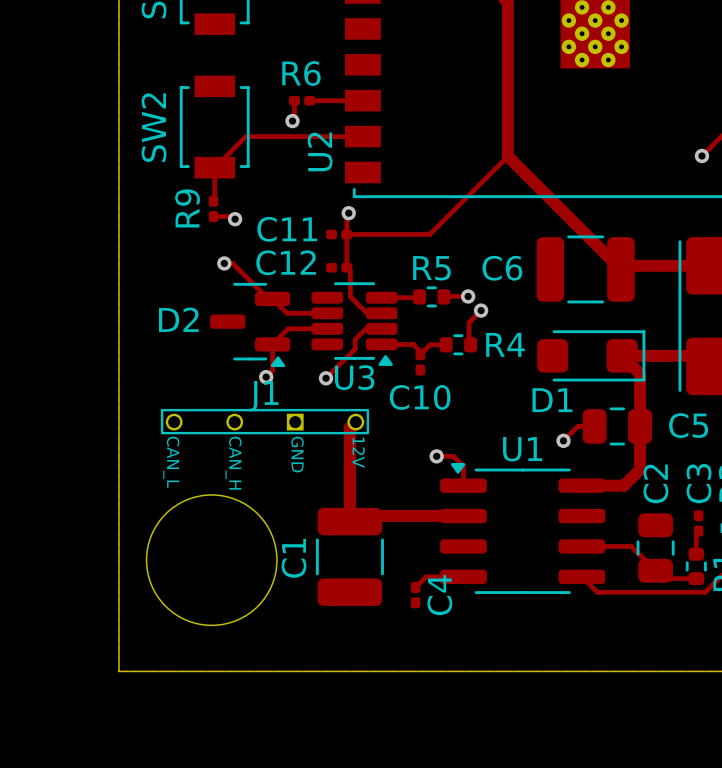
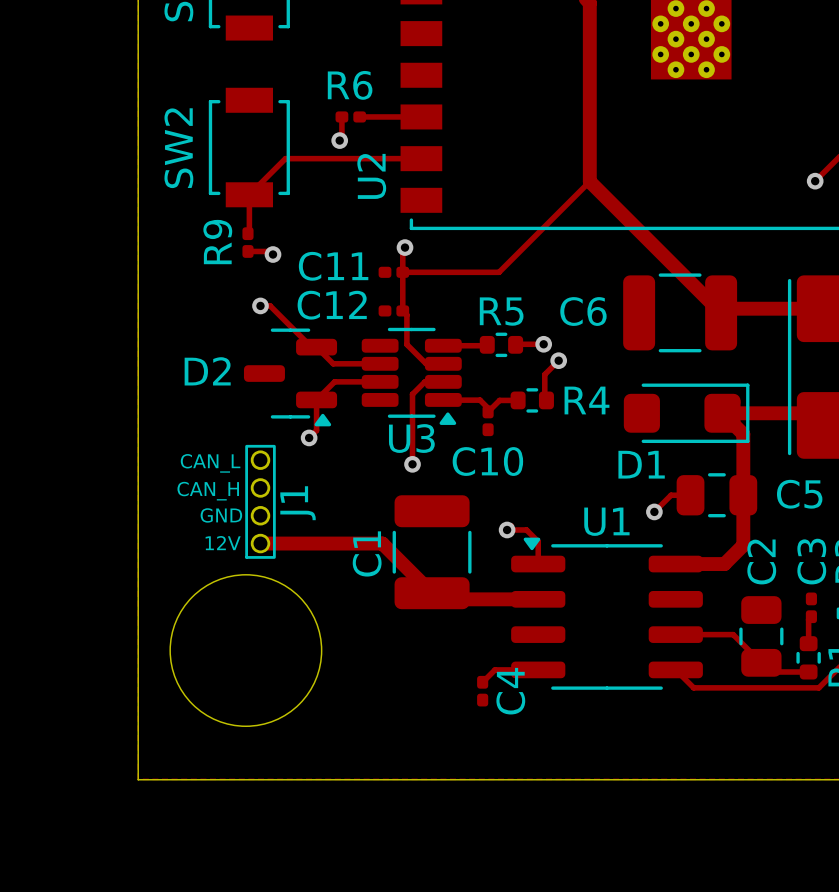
track: (355, 349) (326, 378) -> (412, 405) (412, 464)
via position: (326, 378) -> (412, 464)
J1 footprint: [160, 408, 370, 435] -> [245, 444, 276, 559]
track: (355, 422) (349, 427) (349, 521) (355, 515) (463, 515) -> (260, 543) (382, 543) (438, 599) (538, 599)
C1 position: (349, 556) -> (432, 552)

